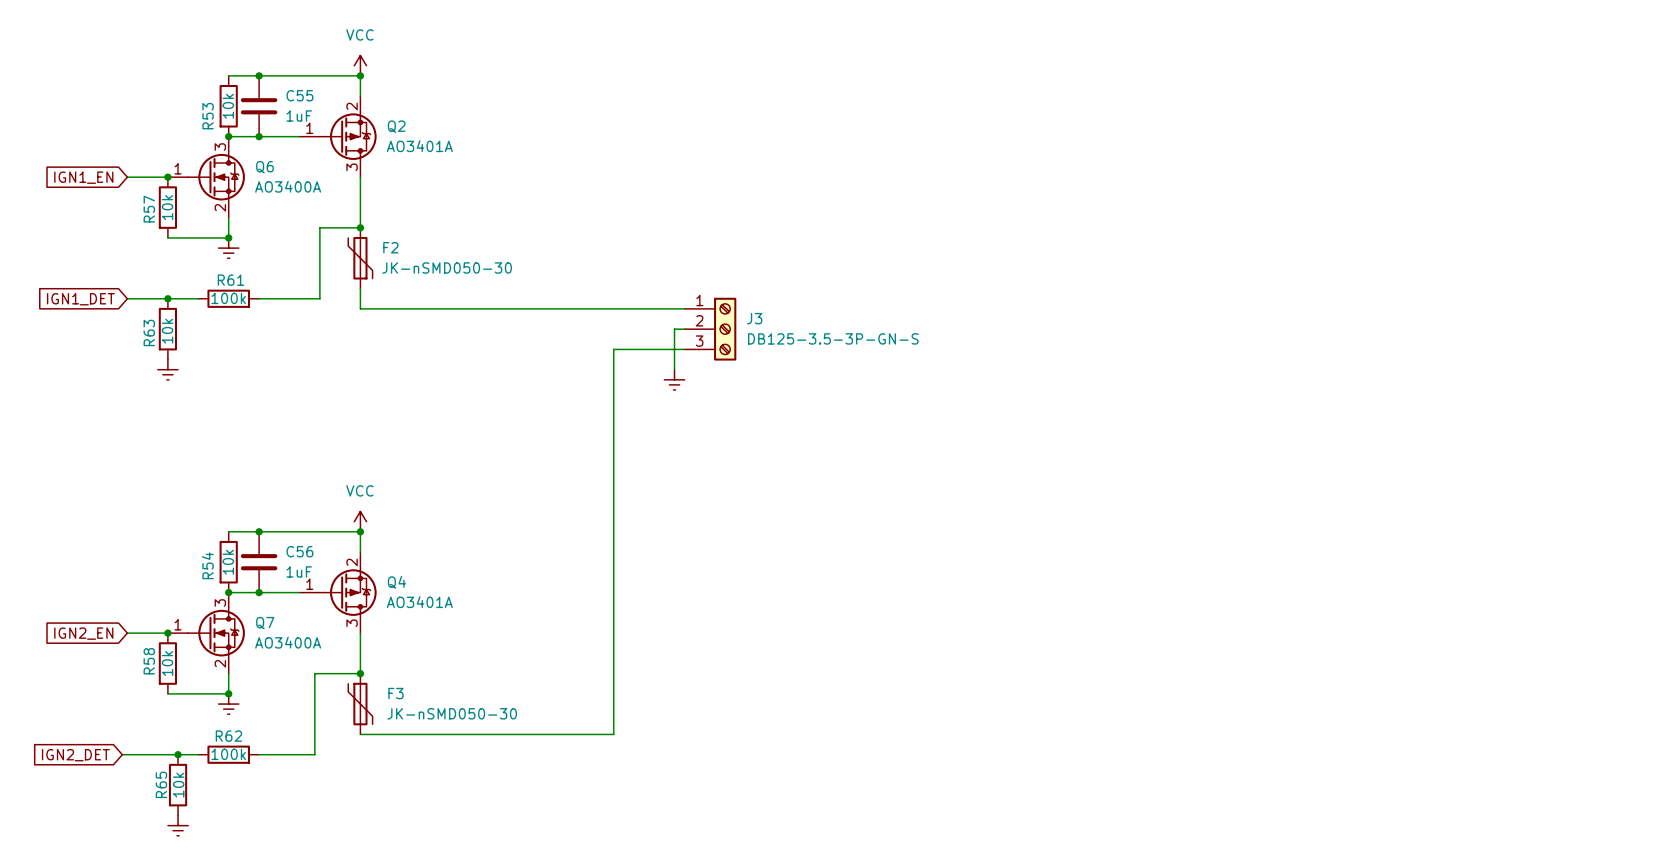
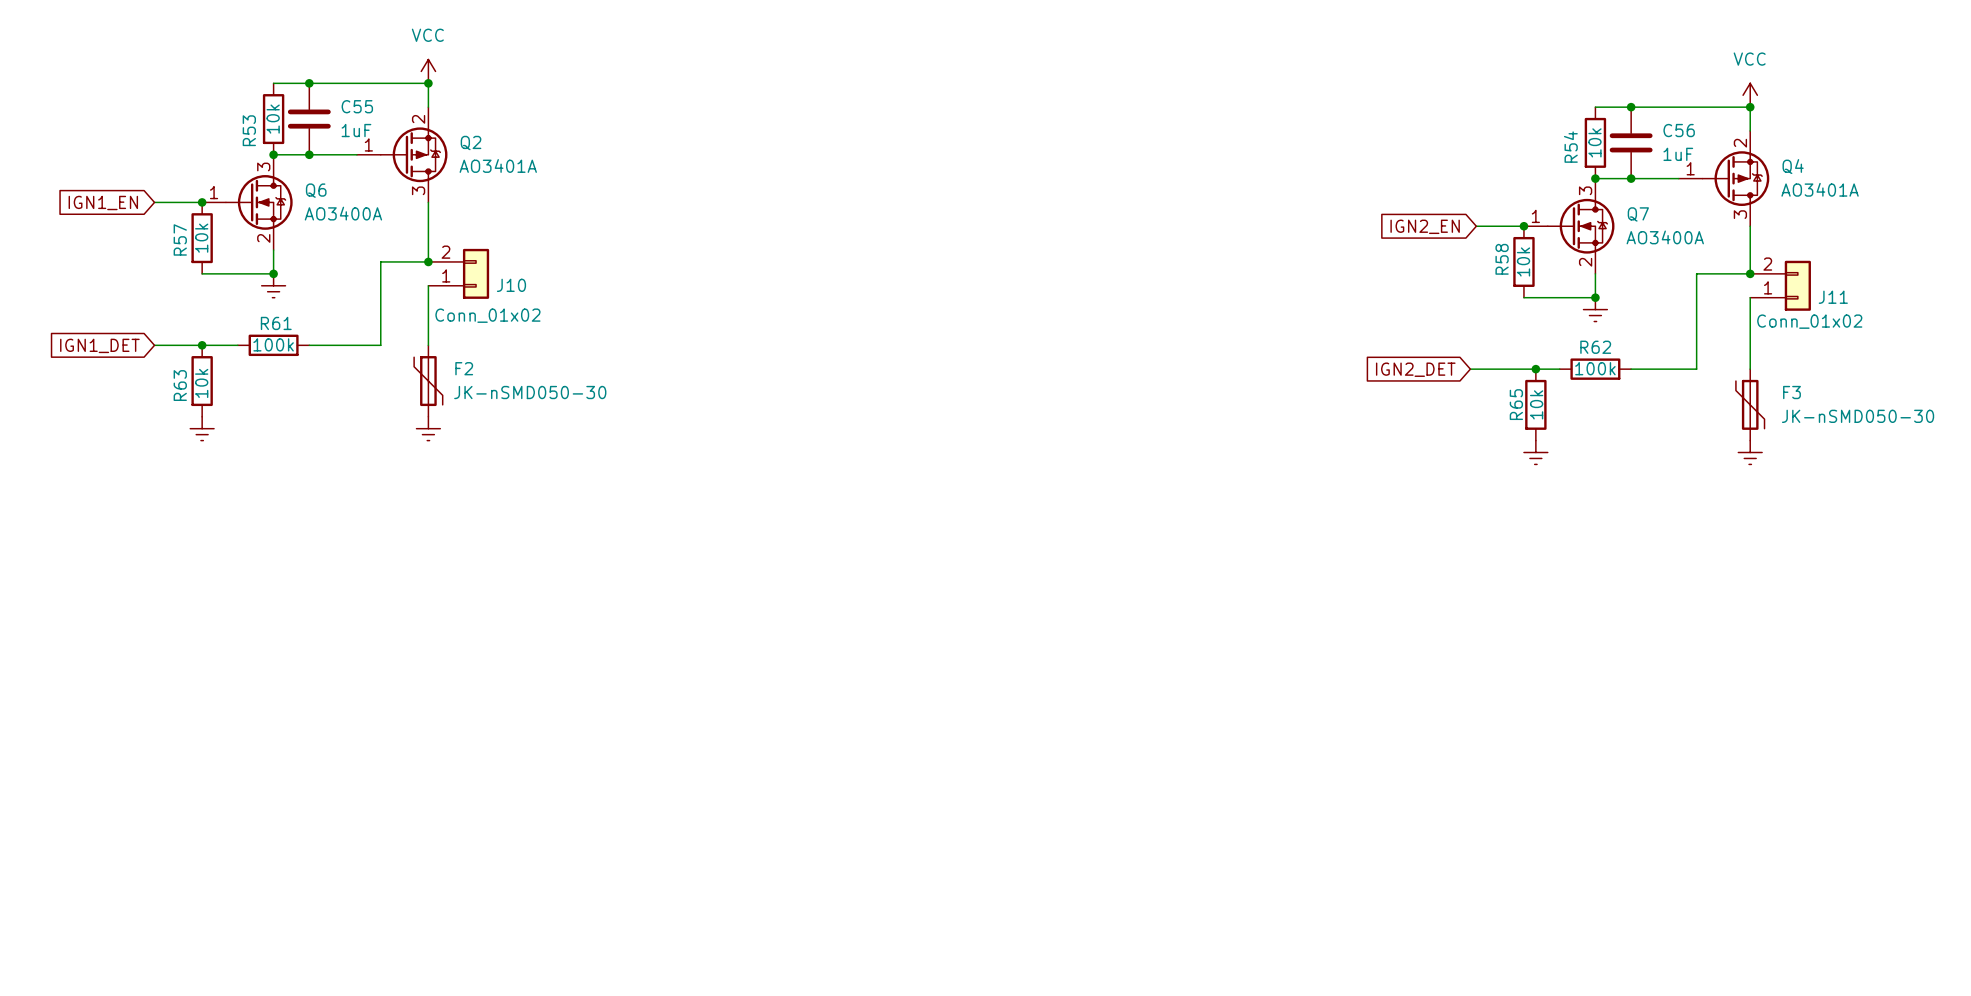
power symbol: none -> VCC (1750, 95)
wire: none -> (1595, 107) (1750, 107) (1750, 130)
junction: none -> (1631, 107)
junction: none -> (1750, 107)
wire: none -> (1595, 178) (1678, 178)
junction: none -> (1595, 178)
junction: none -> (1631, 178)
global label: none -> IGN2_EN (1425, 226)
wire: none -> (1476, 226) (1523, 226)
junction: none -> (1523, 226)
wire: none -> (1750, 226) (1750, 273) (1696, 273) (1696, 369) (1631, 369)
J10: none -> Conn_01x02 (458, 273)
wire: none -> (1595, 273) (1595, 297) (1523, 297)
junction: none -> (1750, 273)
J11: none -> Conn_01x02 (1780, 285)
F2 position: (360, 258) -> (428, 381)
junction: none -> (1595, 297)
wire: none -> (1750, 297) (1750, 369)
power symbol: none -> (1595, 309)
wire: (360, 298) (360, 308) (684, 308) -> none
global label: none -> IGN2_DET (1415, 369)
wire: none -> (1470, 369) (1559, 369)
junction: none -> (1535, 369)
wire: (684, 329) (674, 329) (674, 369) -> none
J3: DB125-3.5-3P-GN-S (710, 329) -> none
wire: (684, 349) (613, 349) (613, 734) (360, 734) -> none
power symbol: none -> (428, 428)
power symbol: (674, 379) -> none
power symbol: none -> (1535, 452)
power symbol: none -> (1750, 452)
power symbol: VCC (360, 521) -> none
wire: (228, 531) (360, 531) (360, 552) -> none
junction: (259, 531) -> none
junction: (360, 531) -> none
R54 position: (228, 562) -> (1595, 142)
C56 position: (259, 562) -> (1631, 142)
wire: (228, 592) (299, 592) -> none
junction: (228, 592) -> none
junction: (259, 592) -> none
Q4 position: (338, 592) -> (1724, 178)
global label: IGN2_EN (83, 633) -> none
wire: (127, 633) (167, 633) -> none
junction: (167, 633) -> none
Q7 position: (206, 633) -> (1569, 226)
wire: (360, 633) (360, 673) (314, 673) (314, 754) (259, 754) -> none
R58 position: (167, 663) -> (1523, 261)
wire: (228, 673) (228, 693) (167, 693) -> none
junction: (360, 673) -> none
junction: (228, 693) -> none
power symbol: (228, 704) -> none
F3 position: (360, 704) -> (1750, 404)
wire: (122, 754) (198, 754) -> none
junction: (178, 754) -> none
R62 position: (228, 754) -> (1595, 369)
global label: IGN2_DET (75, 755) -> none
R65 position: (178, 785) -> (1535, 404)
power symbol: (178, 825) -> none

